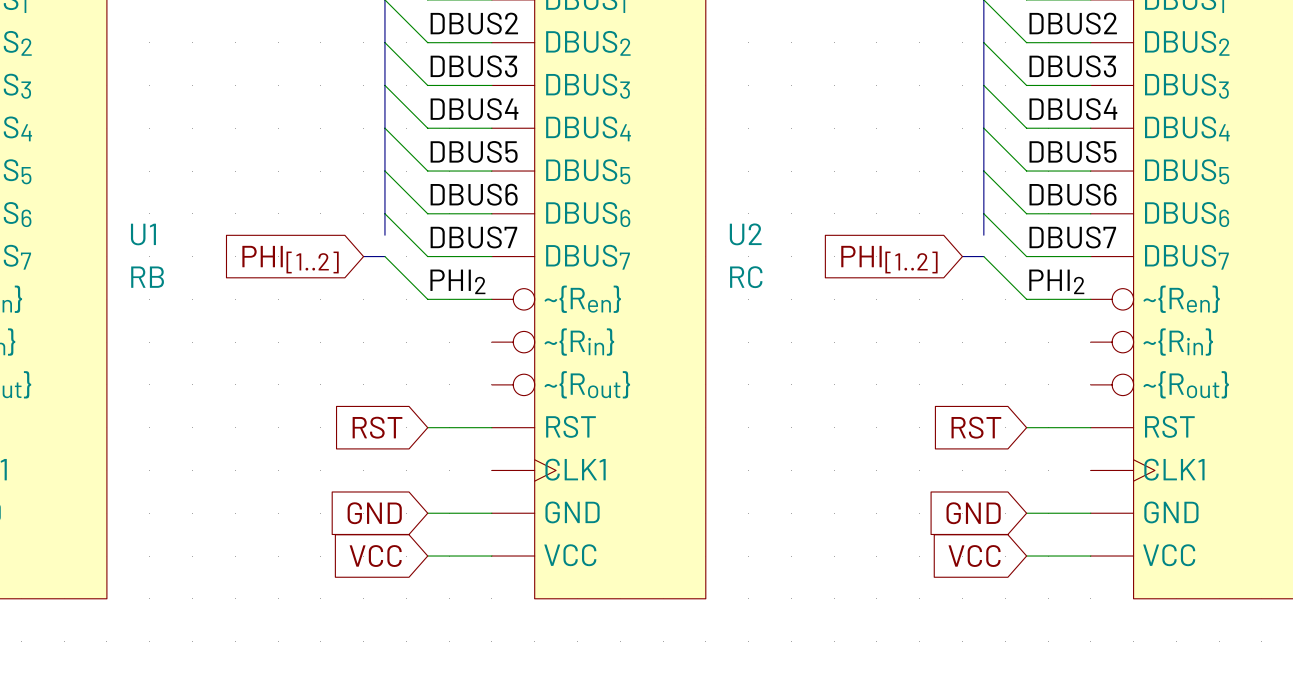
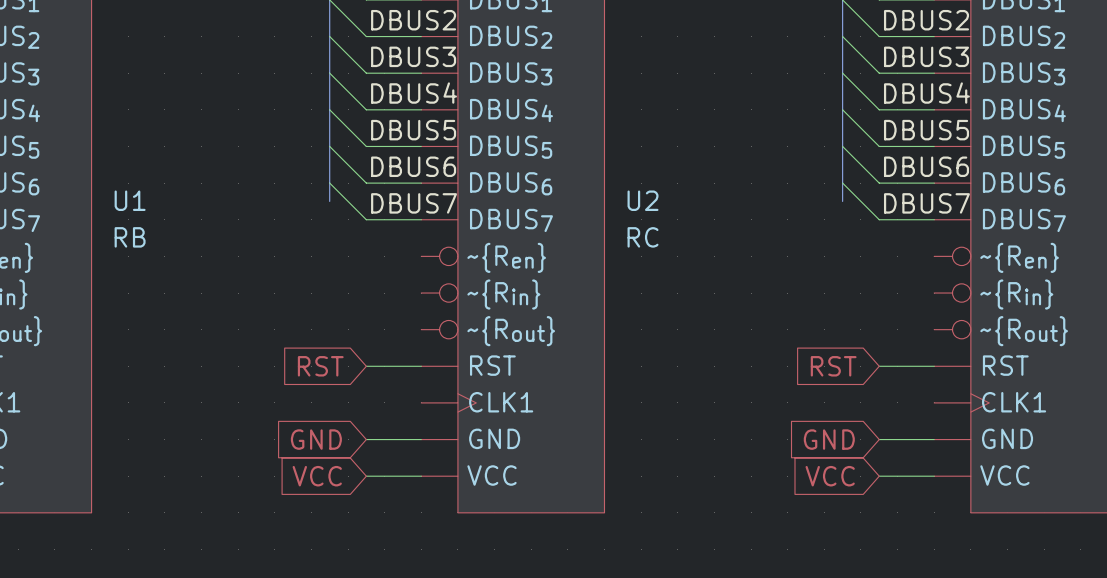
bus: (363, 256) (384, 256) -> none
wire: (384, 256) (427, 299) (491, 299) -> none
bus: (962, 256) (983, 256) -> none
wire: (983, 256) (1026, 299) (1090, 299) -> none
global label: PHI[1..2] (290, 259) -> none
global label: PHI[1..2] (889, 259) -> none
label: PHI2 (457, 281) -> none
label: PHI2 (1056, 281) -> none

